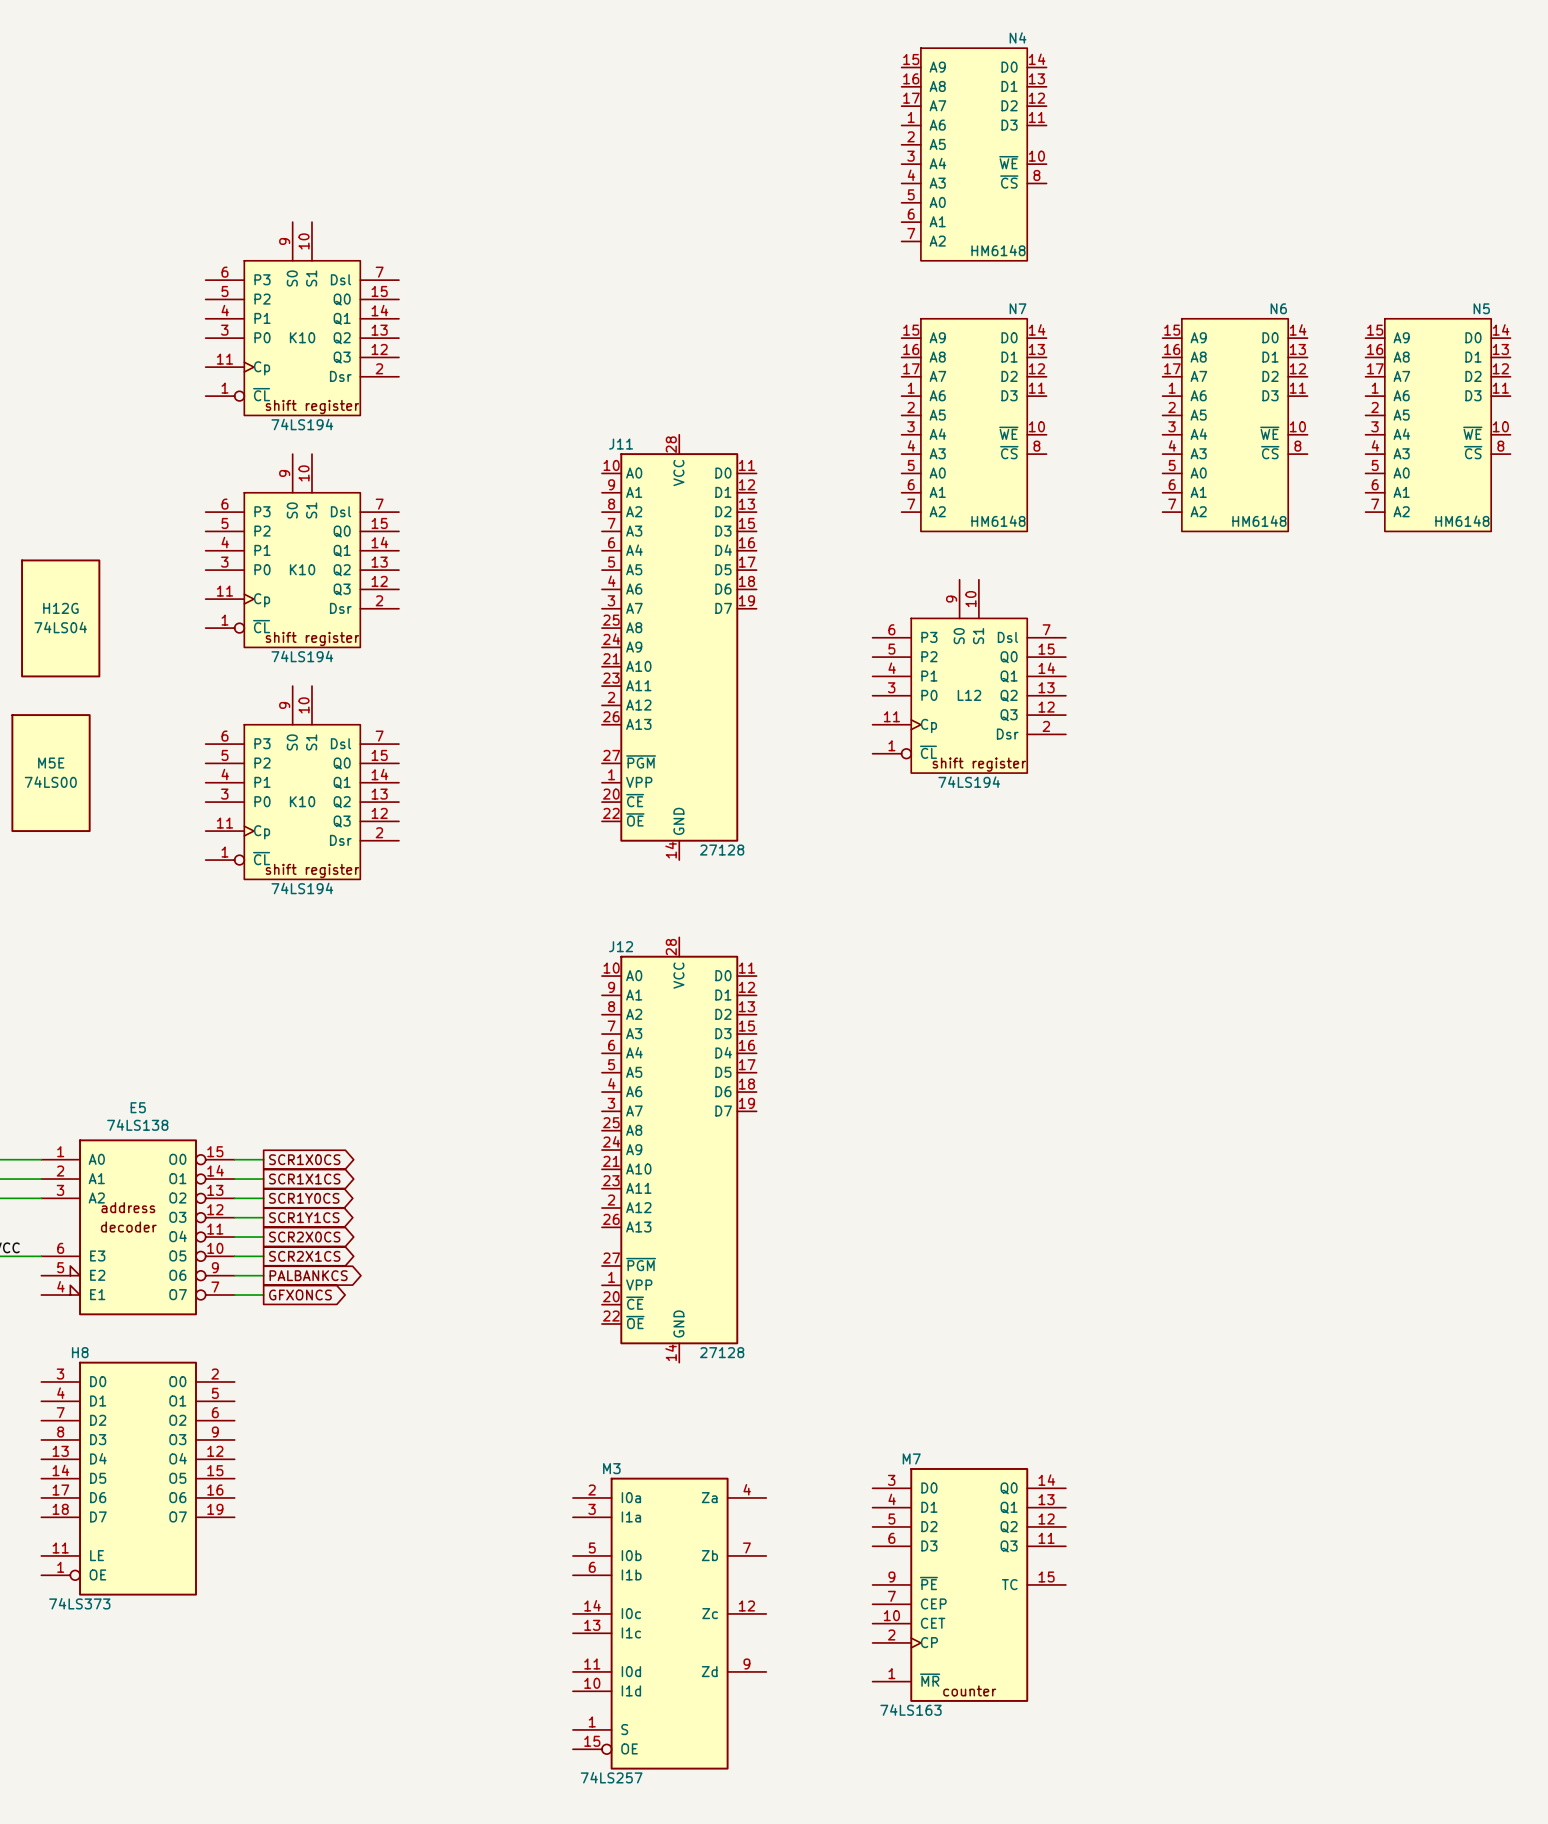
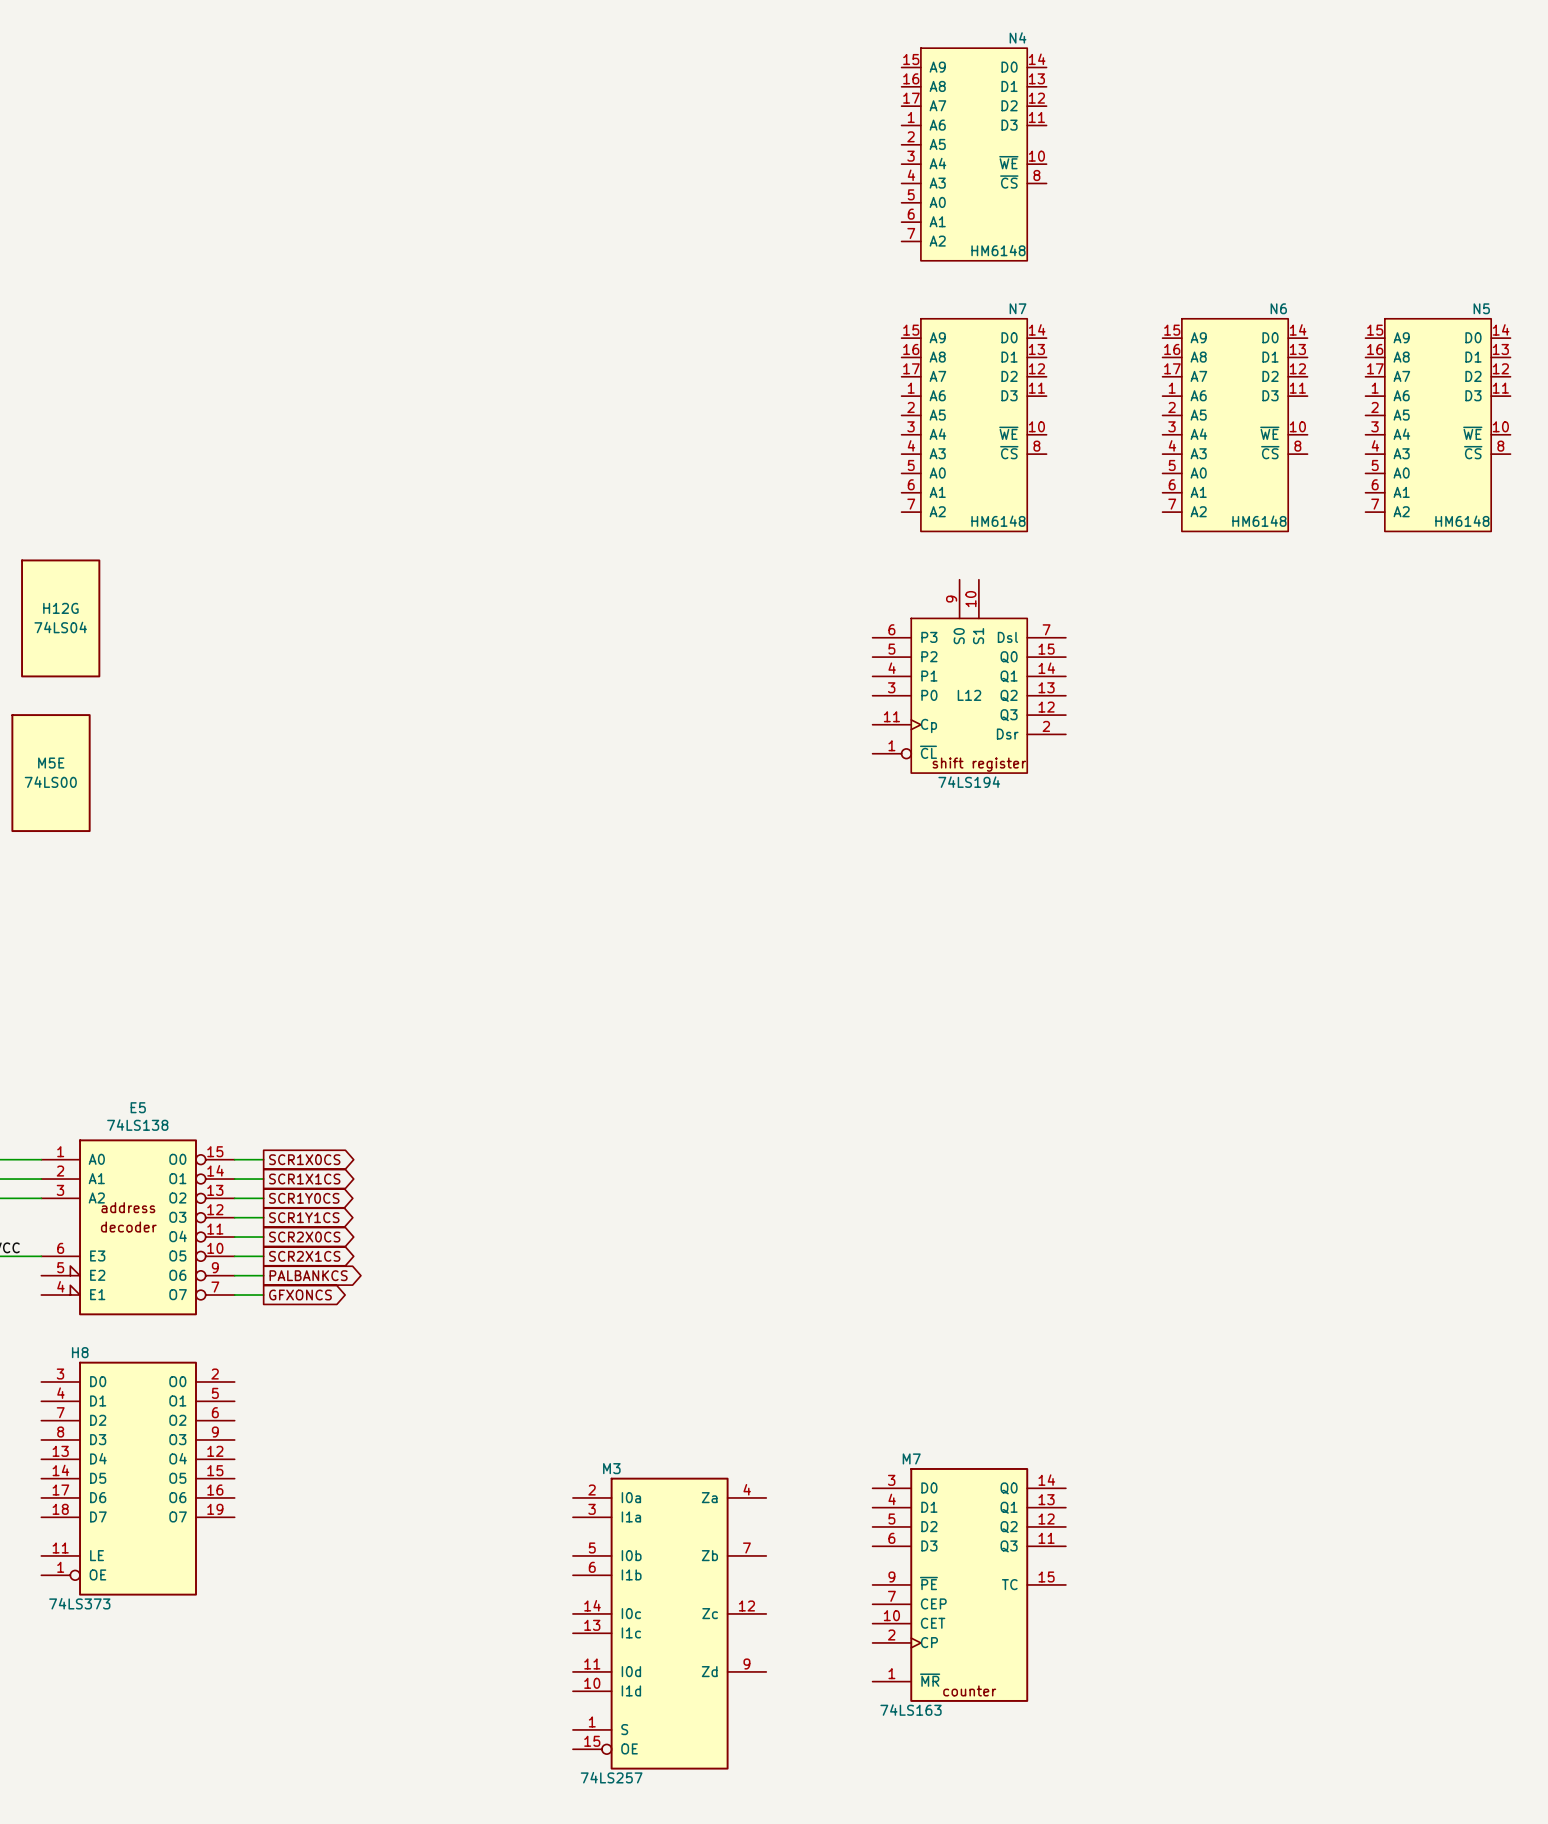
K10: 74LS194 (302, 318) -> none
K10: 74LS194 (302, 550) -> none
J11: 27128 (679, 647) -> none
K10: 74LS194 (302, 782) -> none
J12: 27128 (679, 1150) -> none

